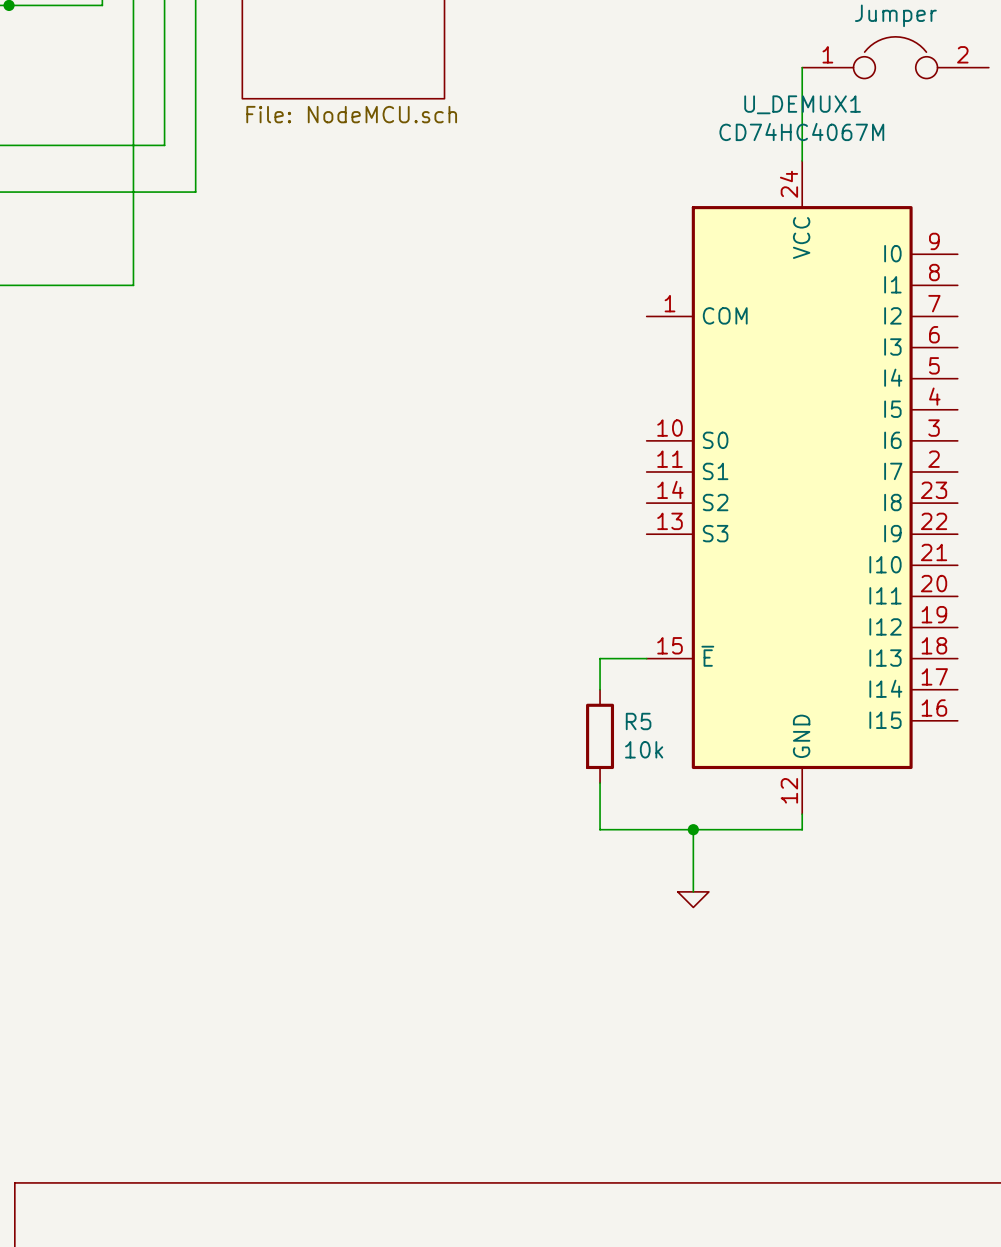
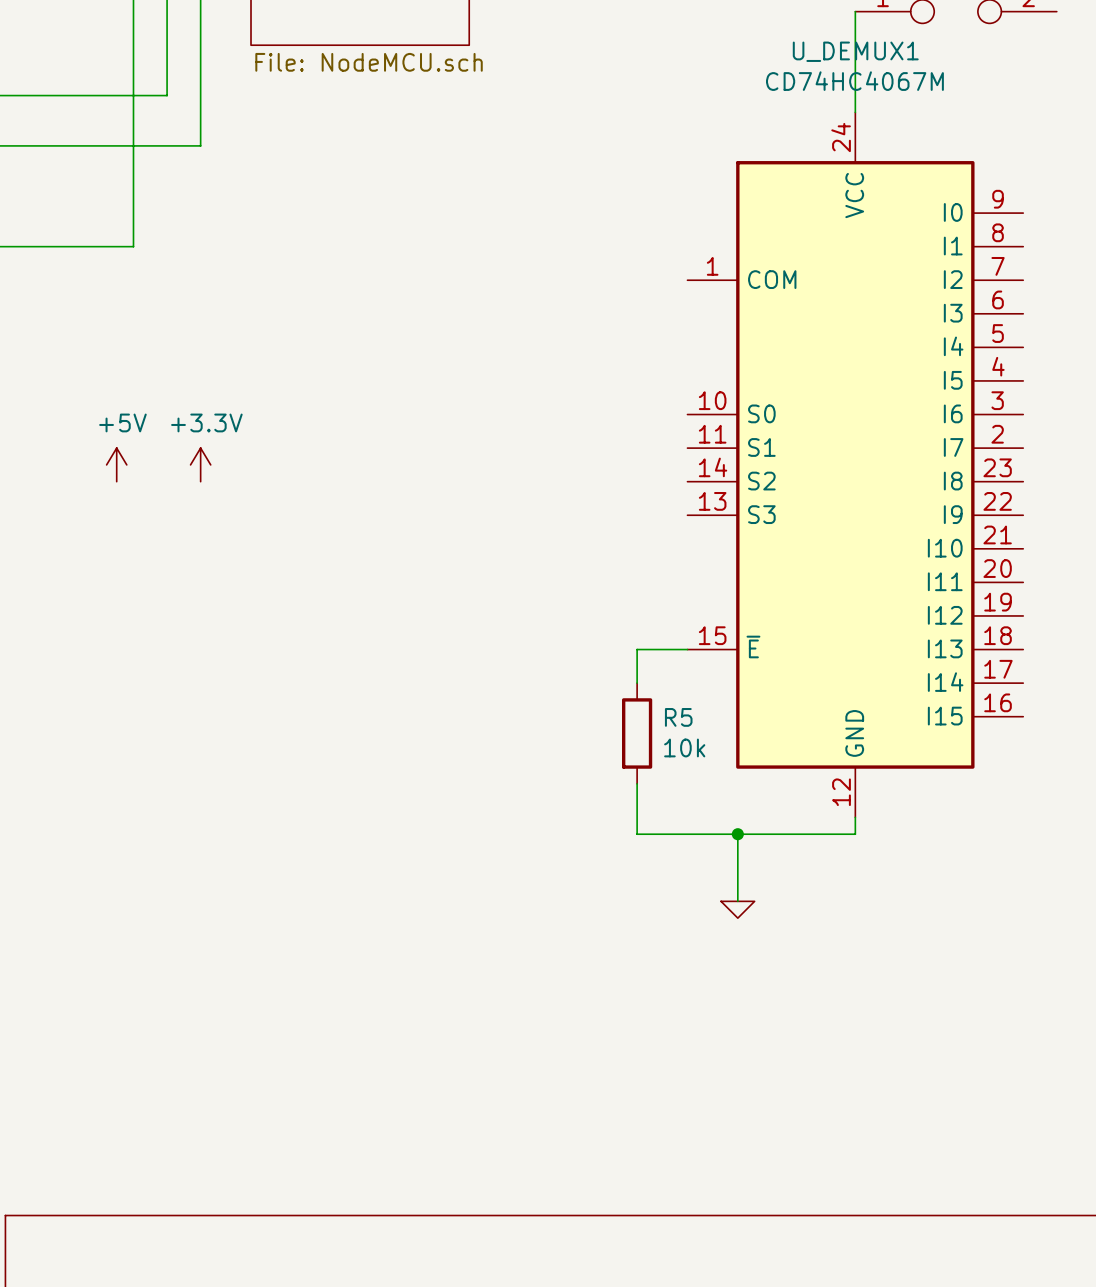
power symbol: none -> +5V (116, 464)
power symbol: none -> +3.3V (200, 464)

